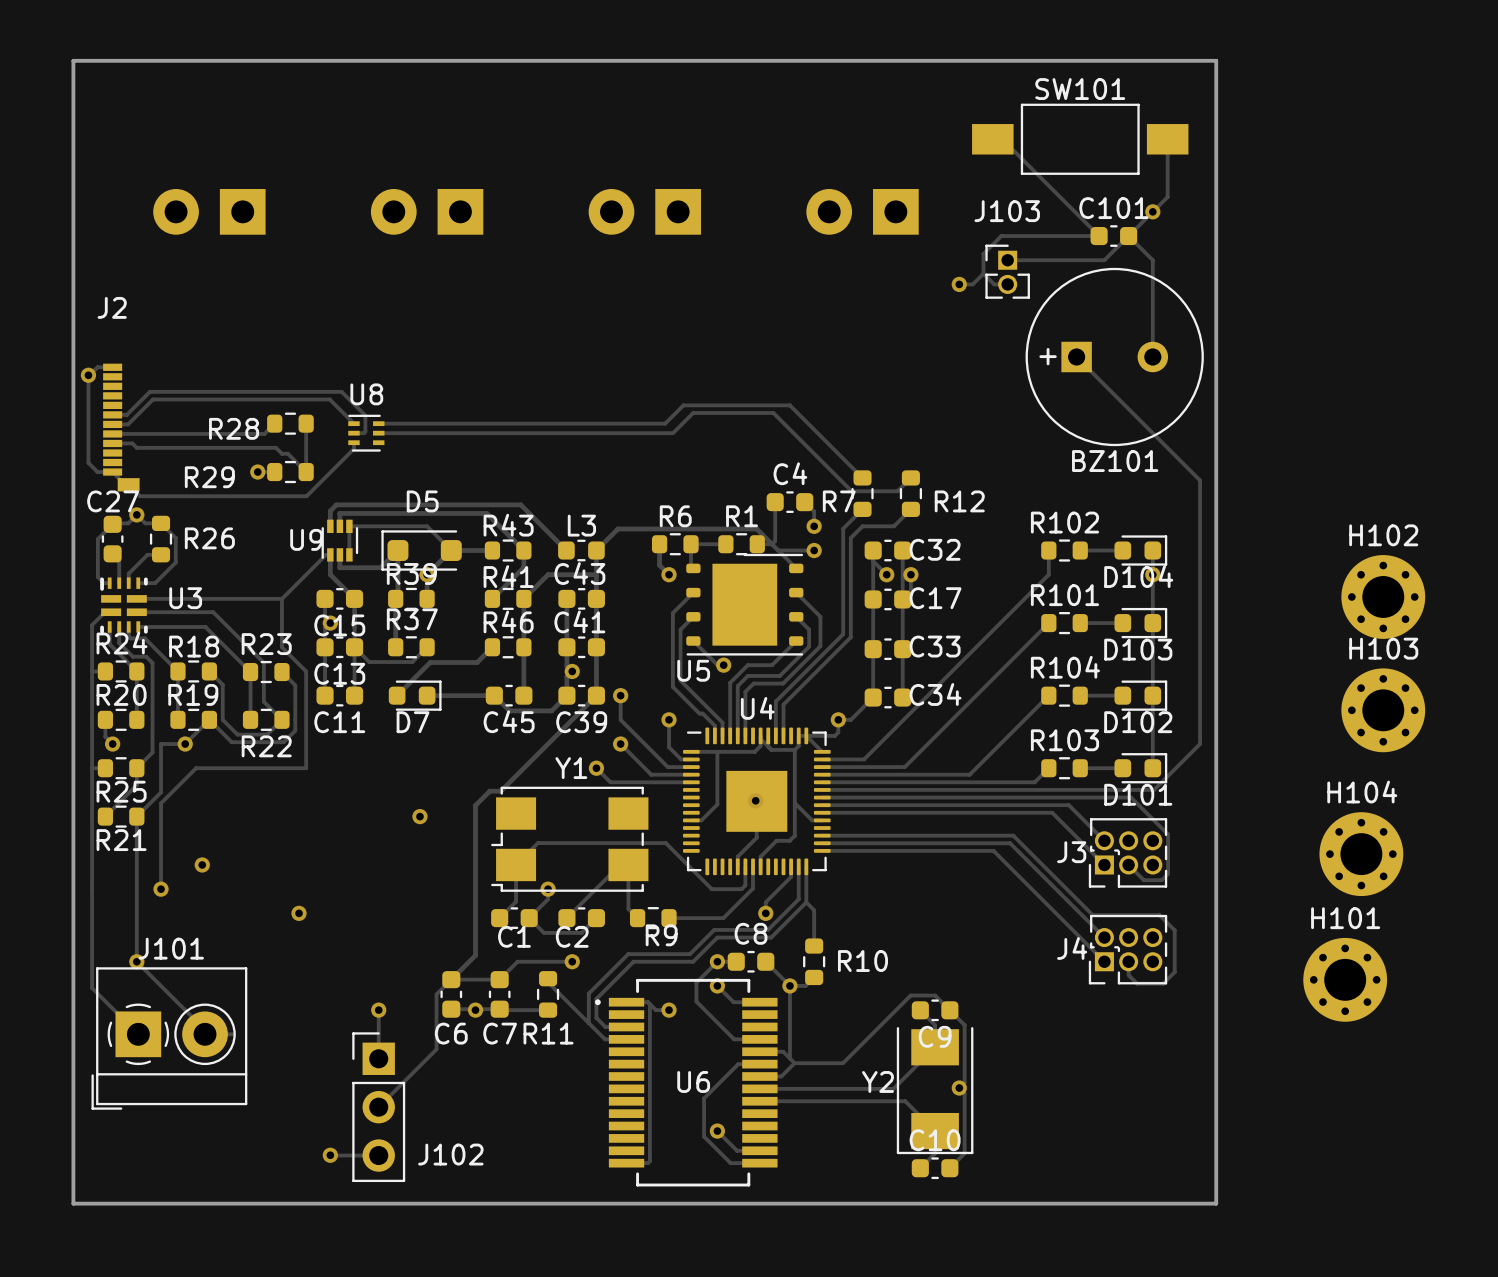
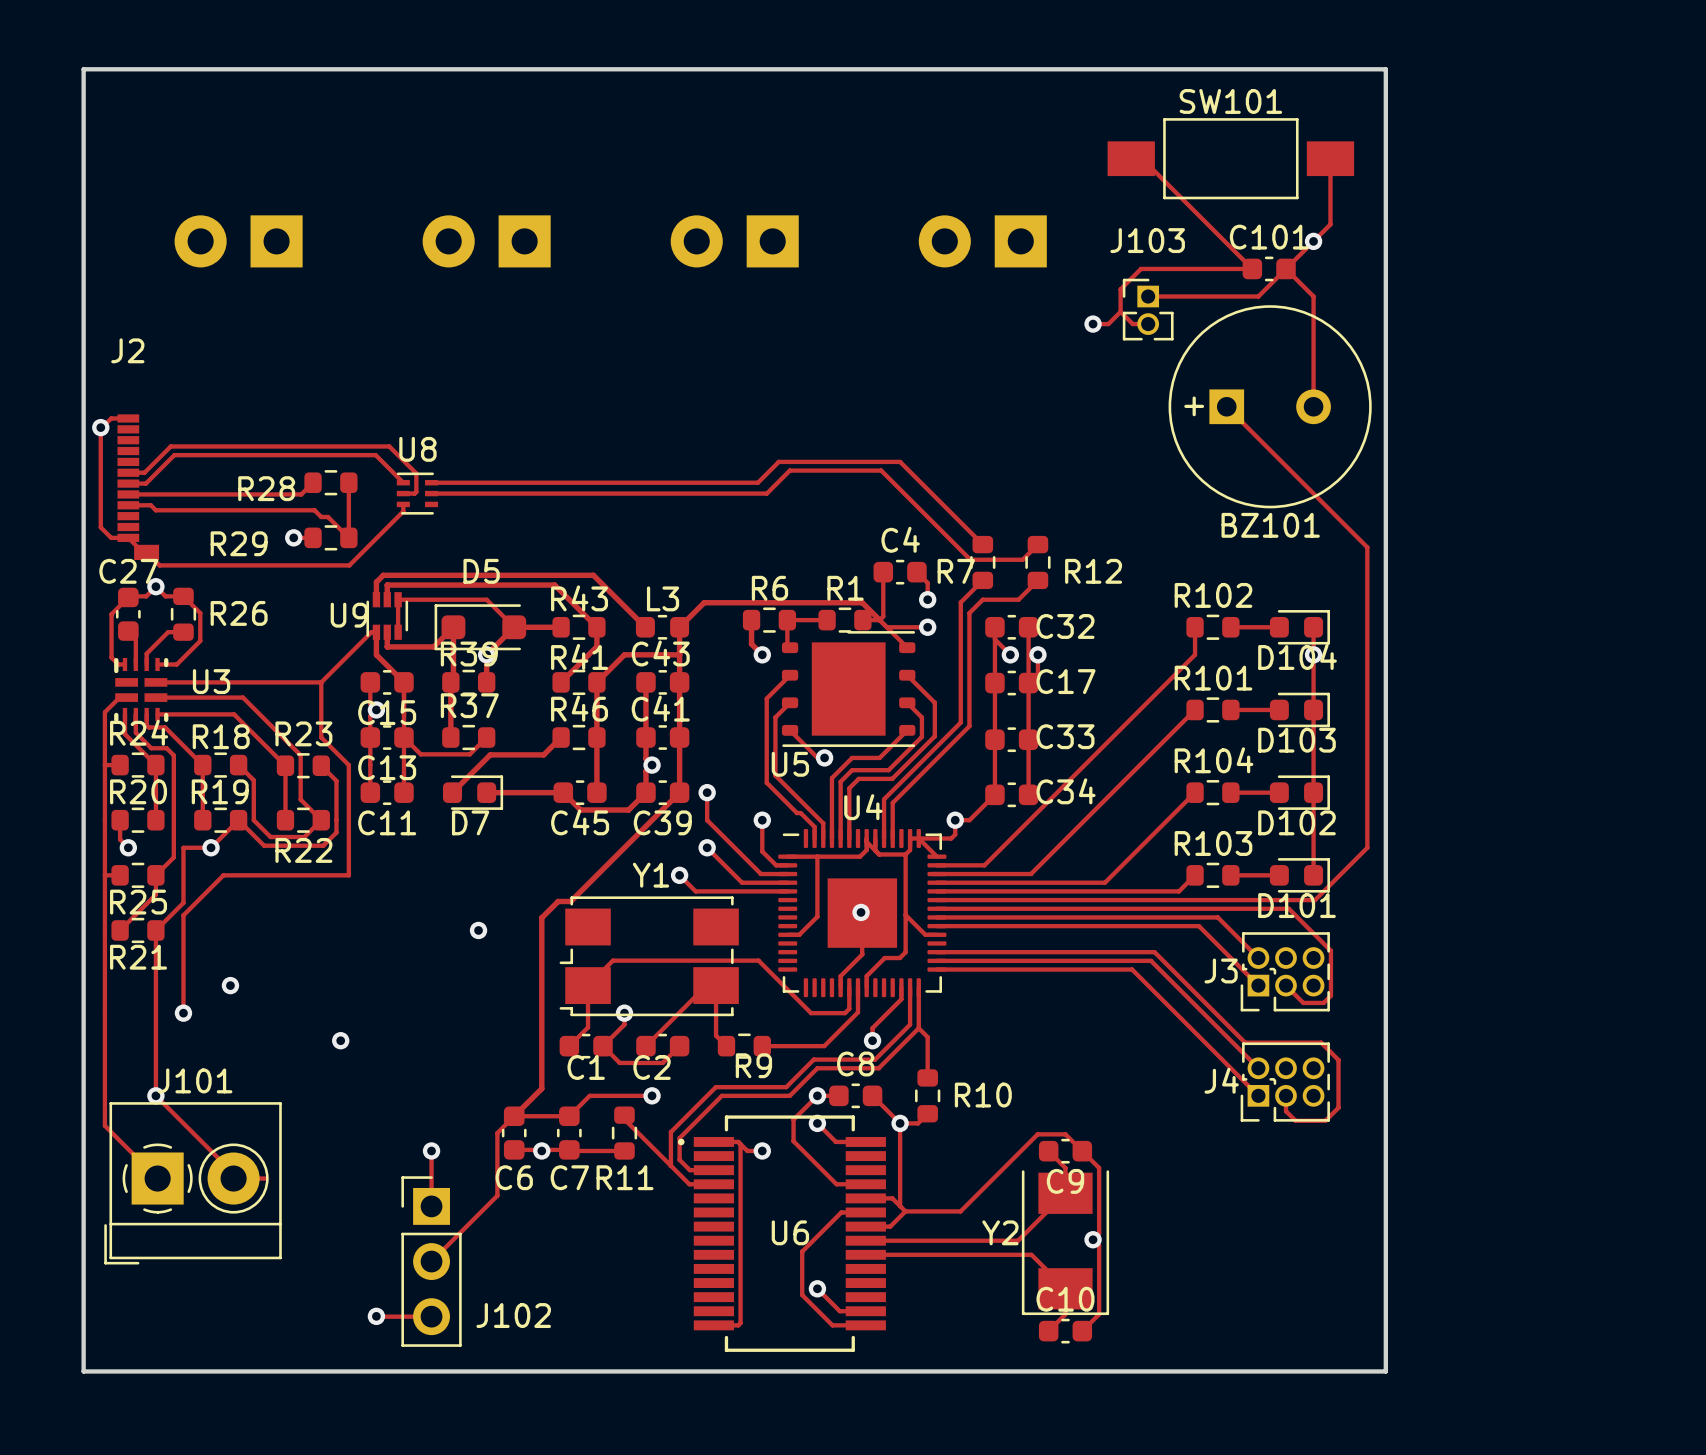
H102: (1383, 596) -> none
H103: (1383, 710) -> none
H104: (1361, 854) -> none
H101: (1345, 979) -> none

